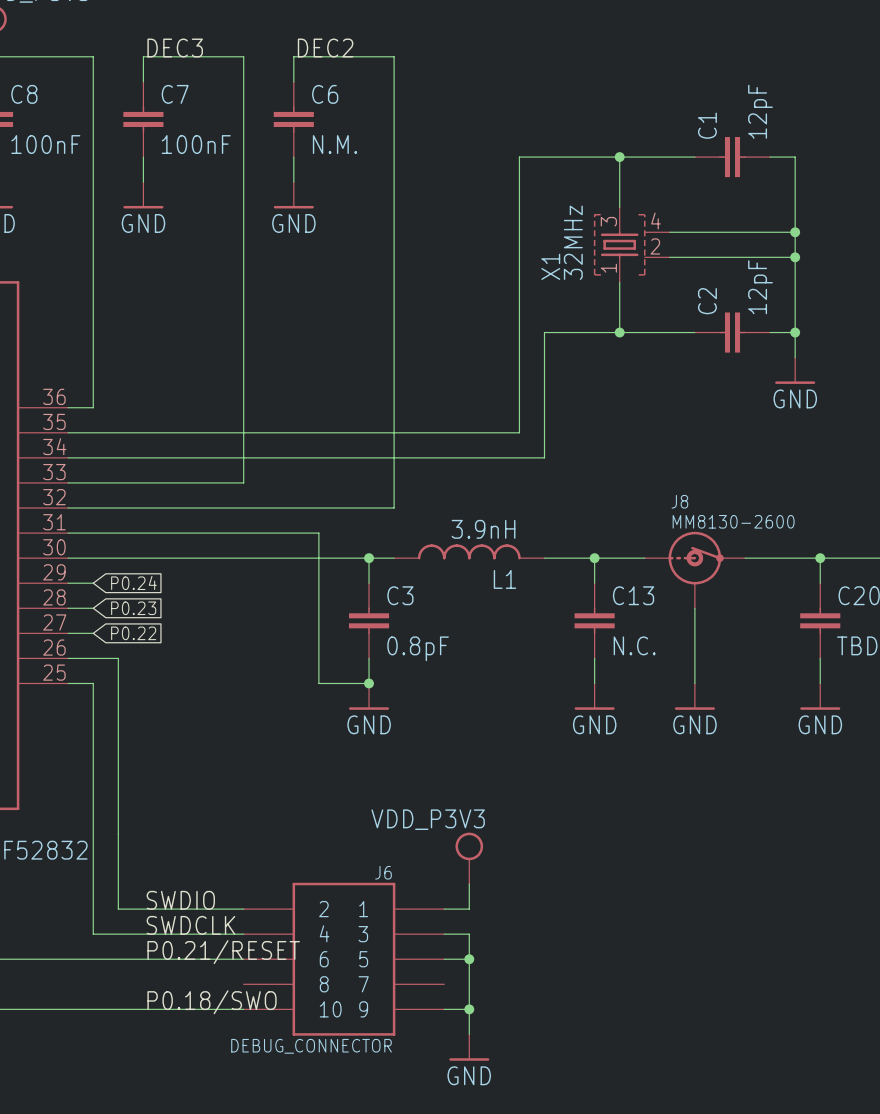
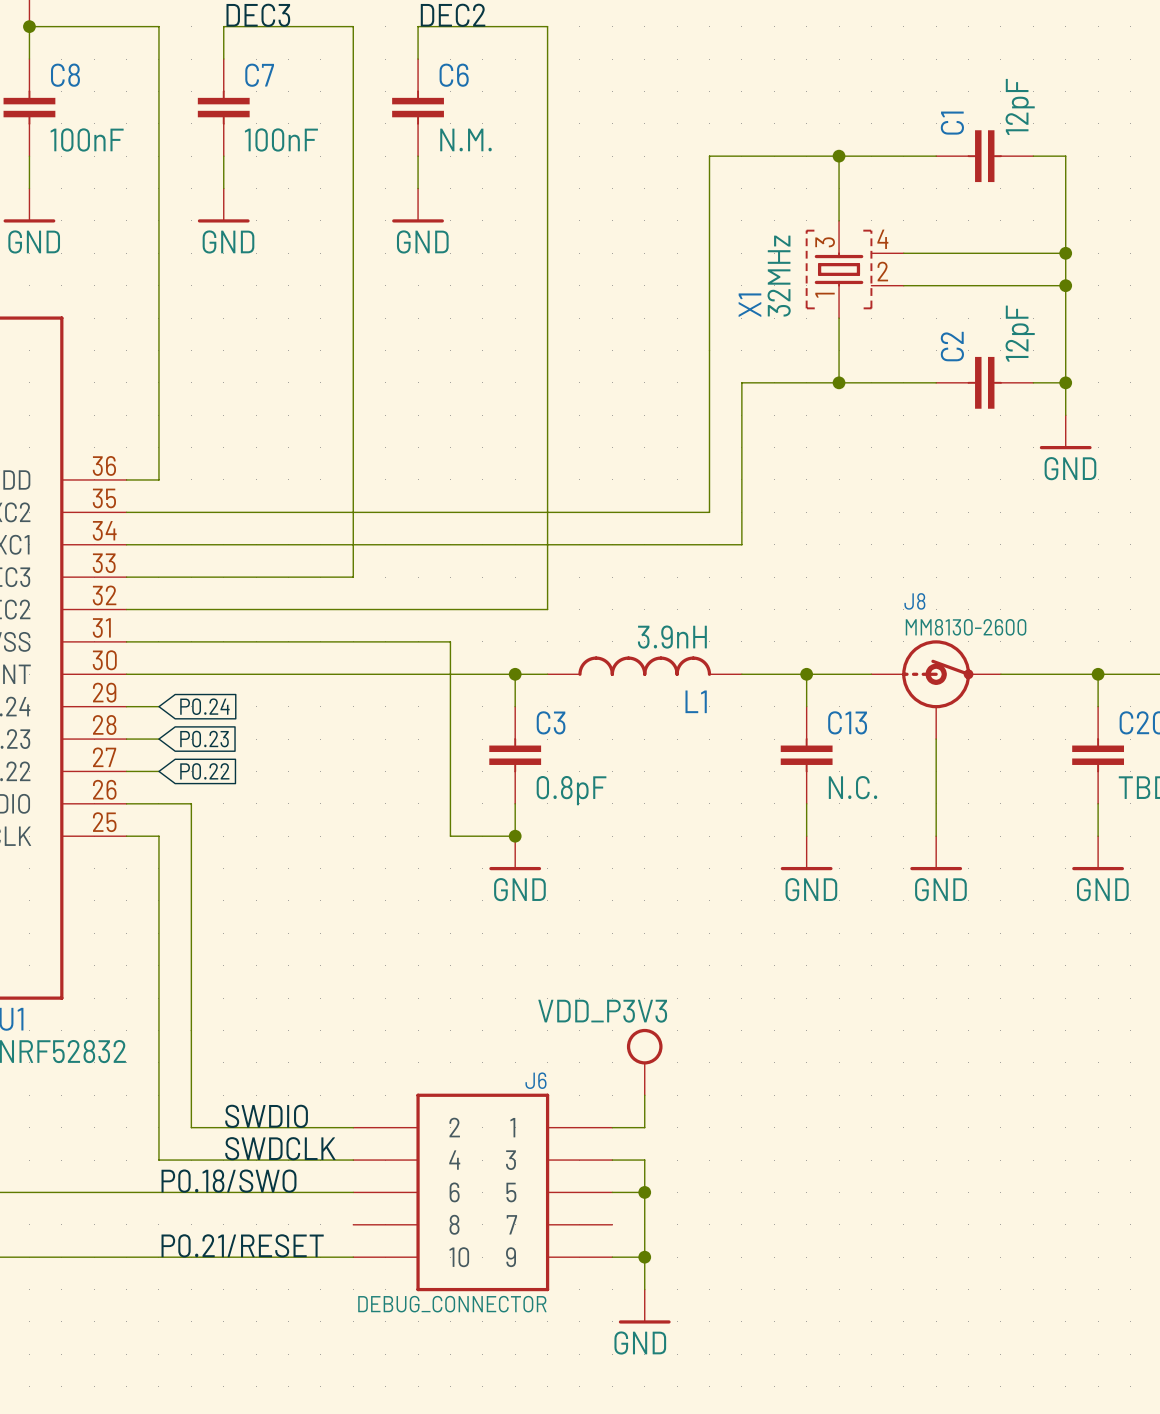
label position: P0.21/RESET (223, 952) -> P0.21/RESET (242, 1245)
label position: P0.18/SWO (212, 1002) -> P0.18/SWO (228, 1181)

